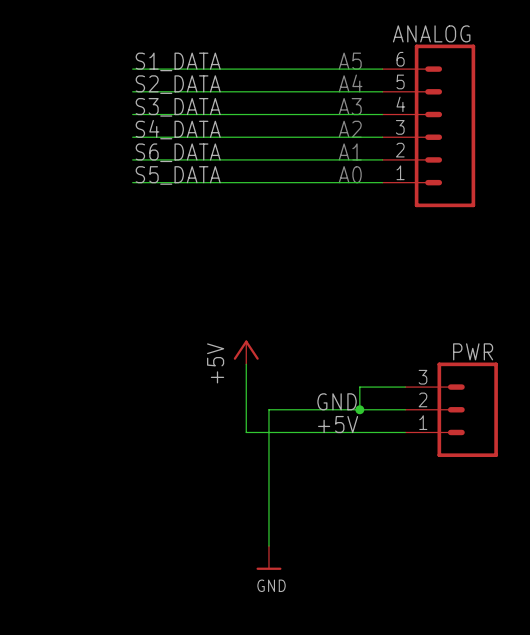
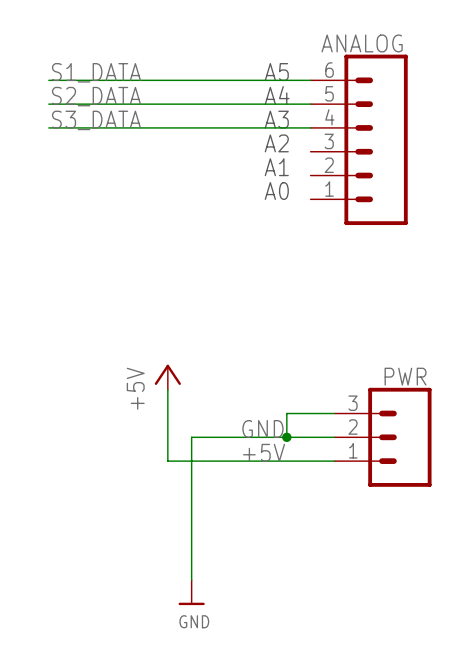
label: S4_DATA (178, 129) -> none
wire: (132, 137) (382, 137) -> none
label: S6_DATA (178, 152) -> none
wire: (132, 159) (382, 159) -> none
label: S5_DATA (178, 175) -> none
wire: (132, 182) (382, 182) -> none

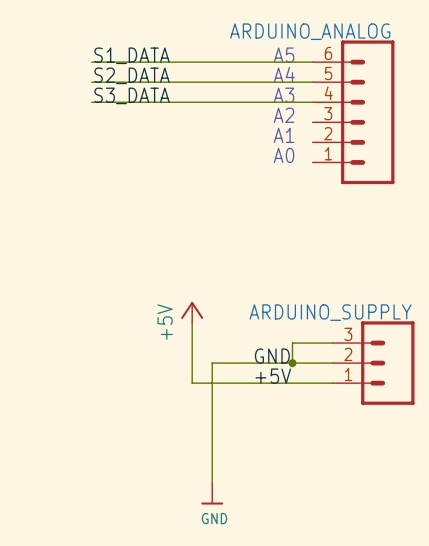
ANALOG name: ANALOG (362, 43) -> ARDUINO_ANALOG (310, 31)
PWR name: PWR (405, 376) -> ARDUINO_SUPPLY (330, 312)

